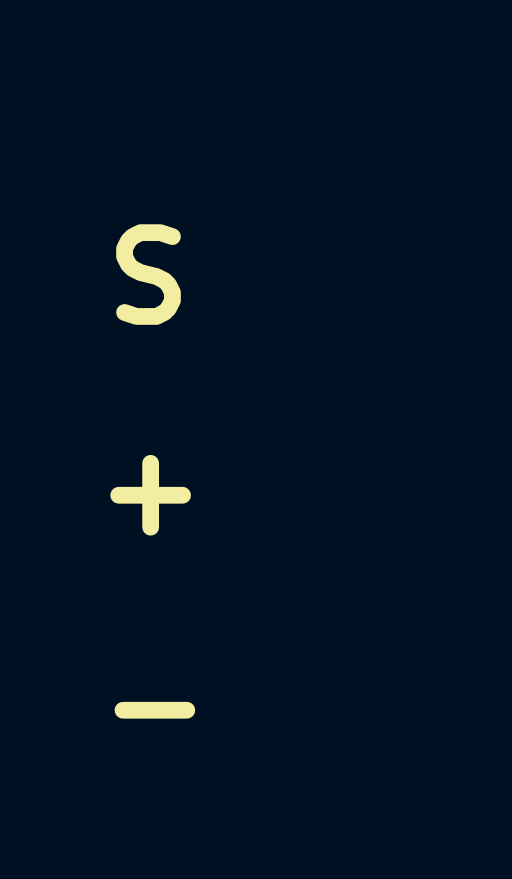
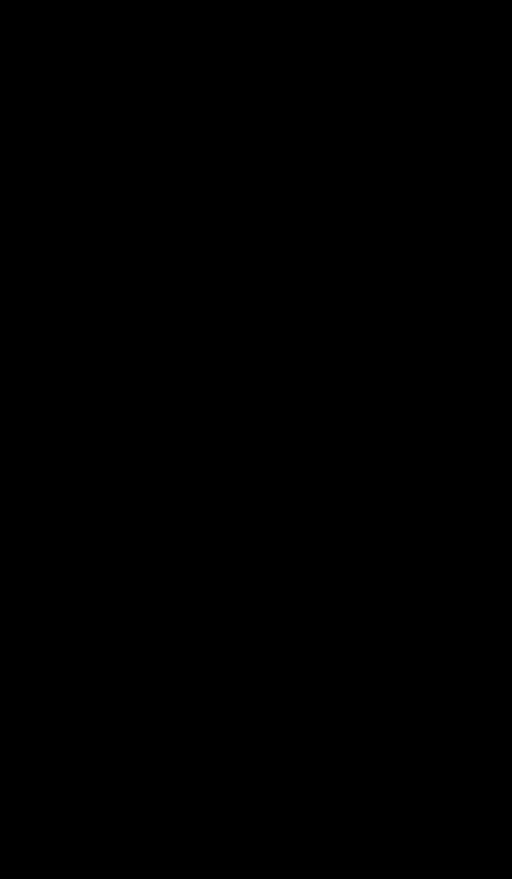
text: S (148, 274) -> none
text: + (150, 495) -> none
text: - (154, 710) -> none

